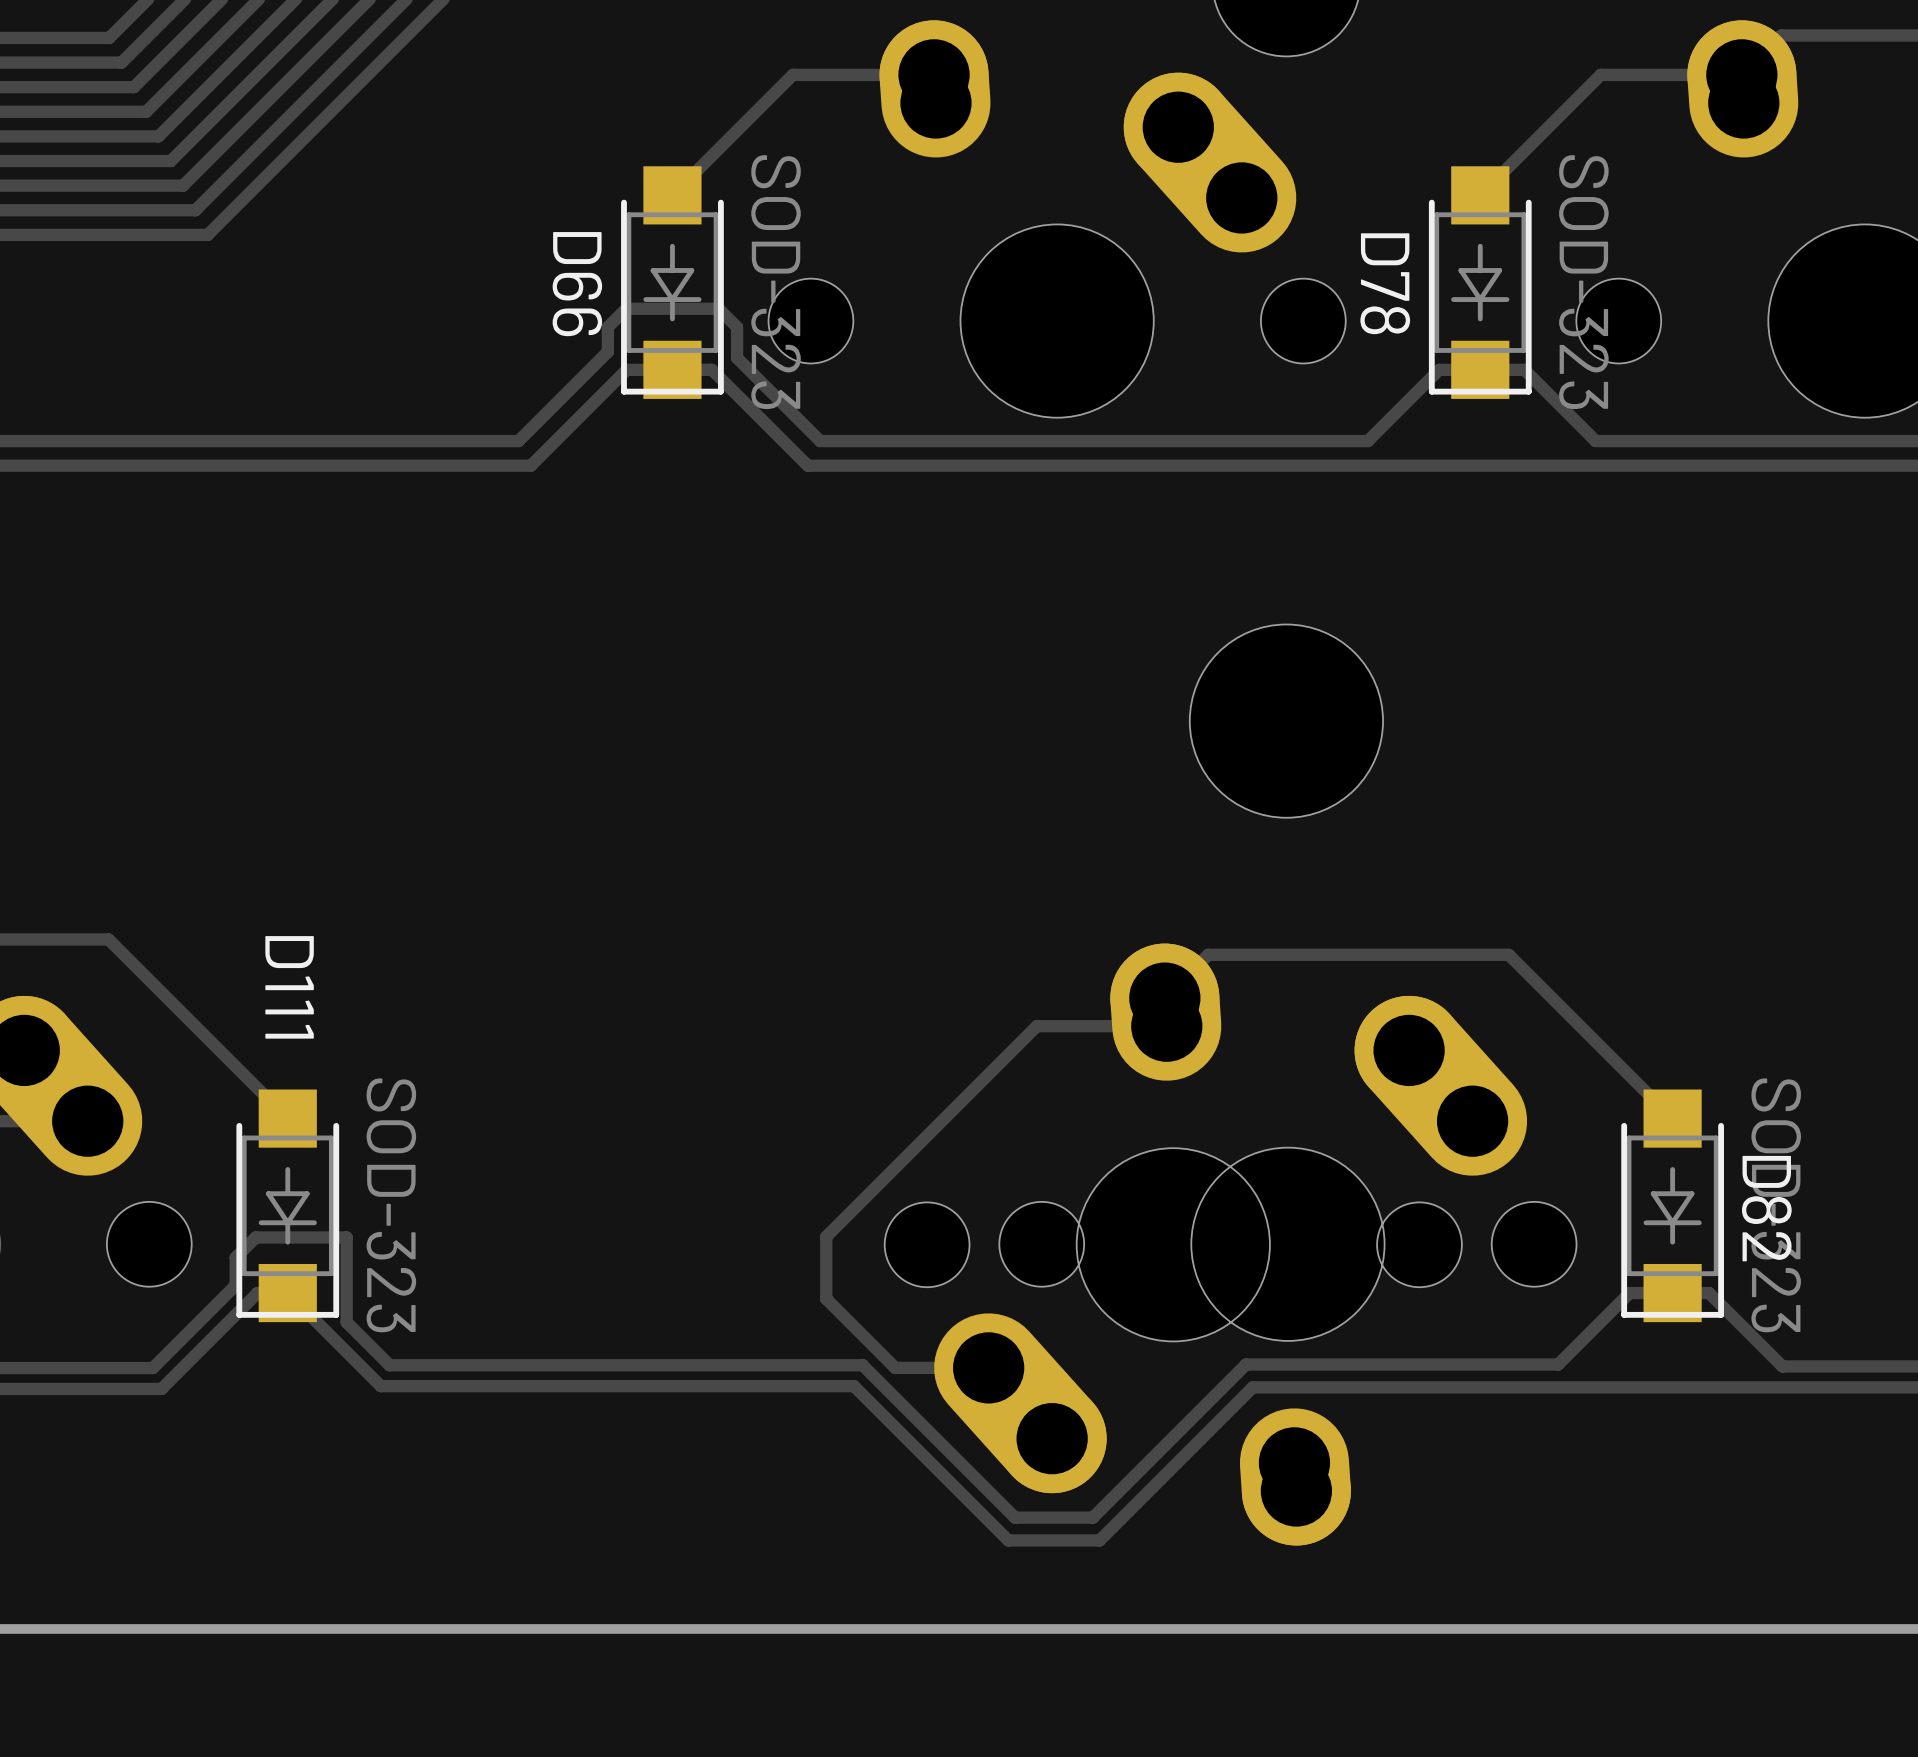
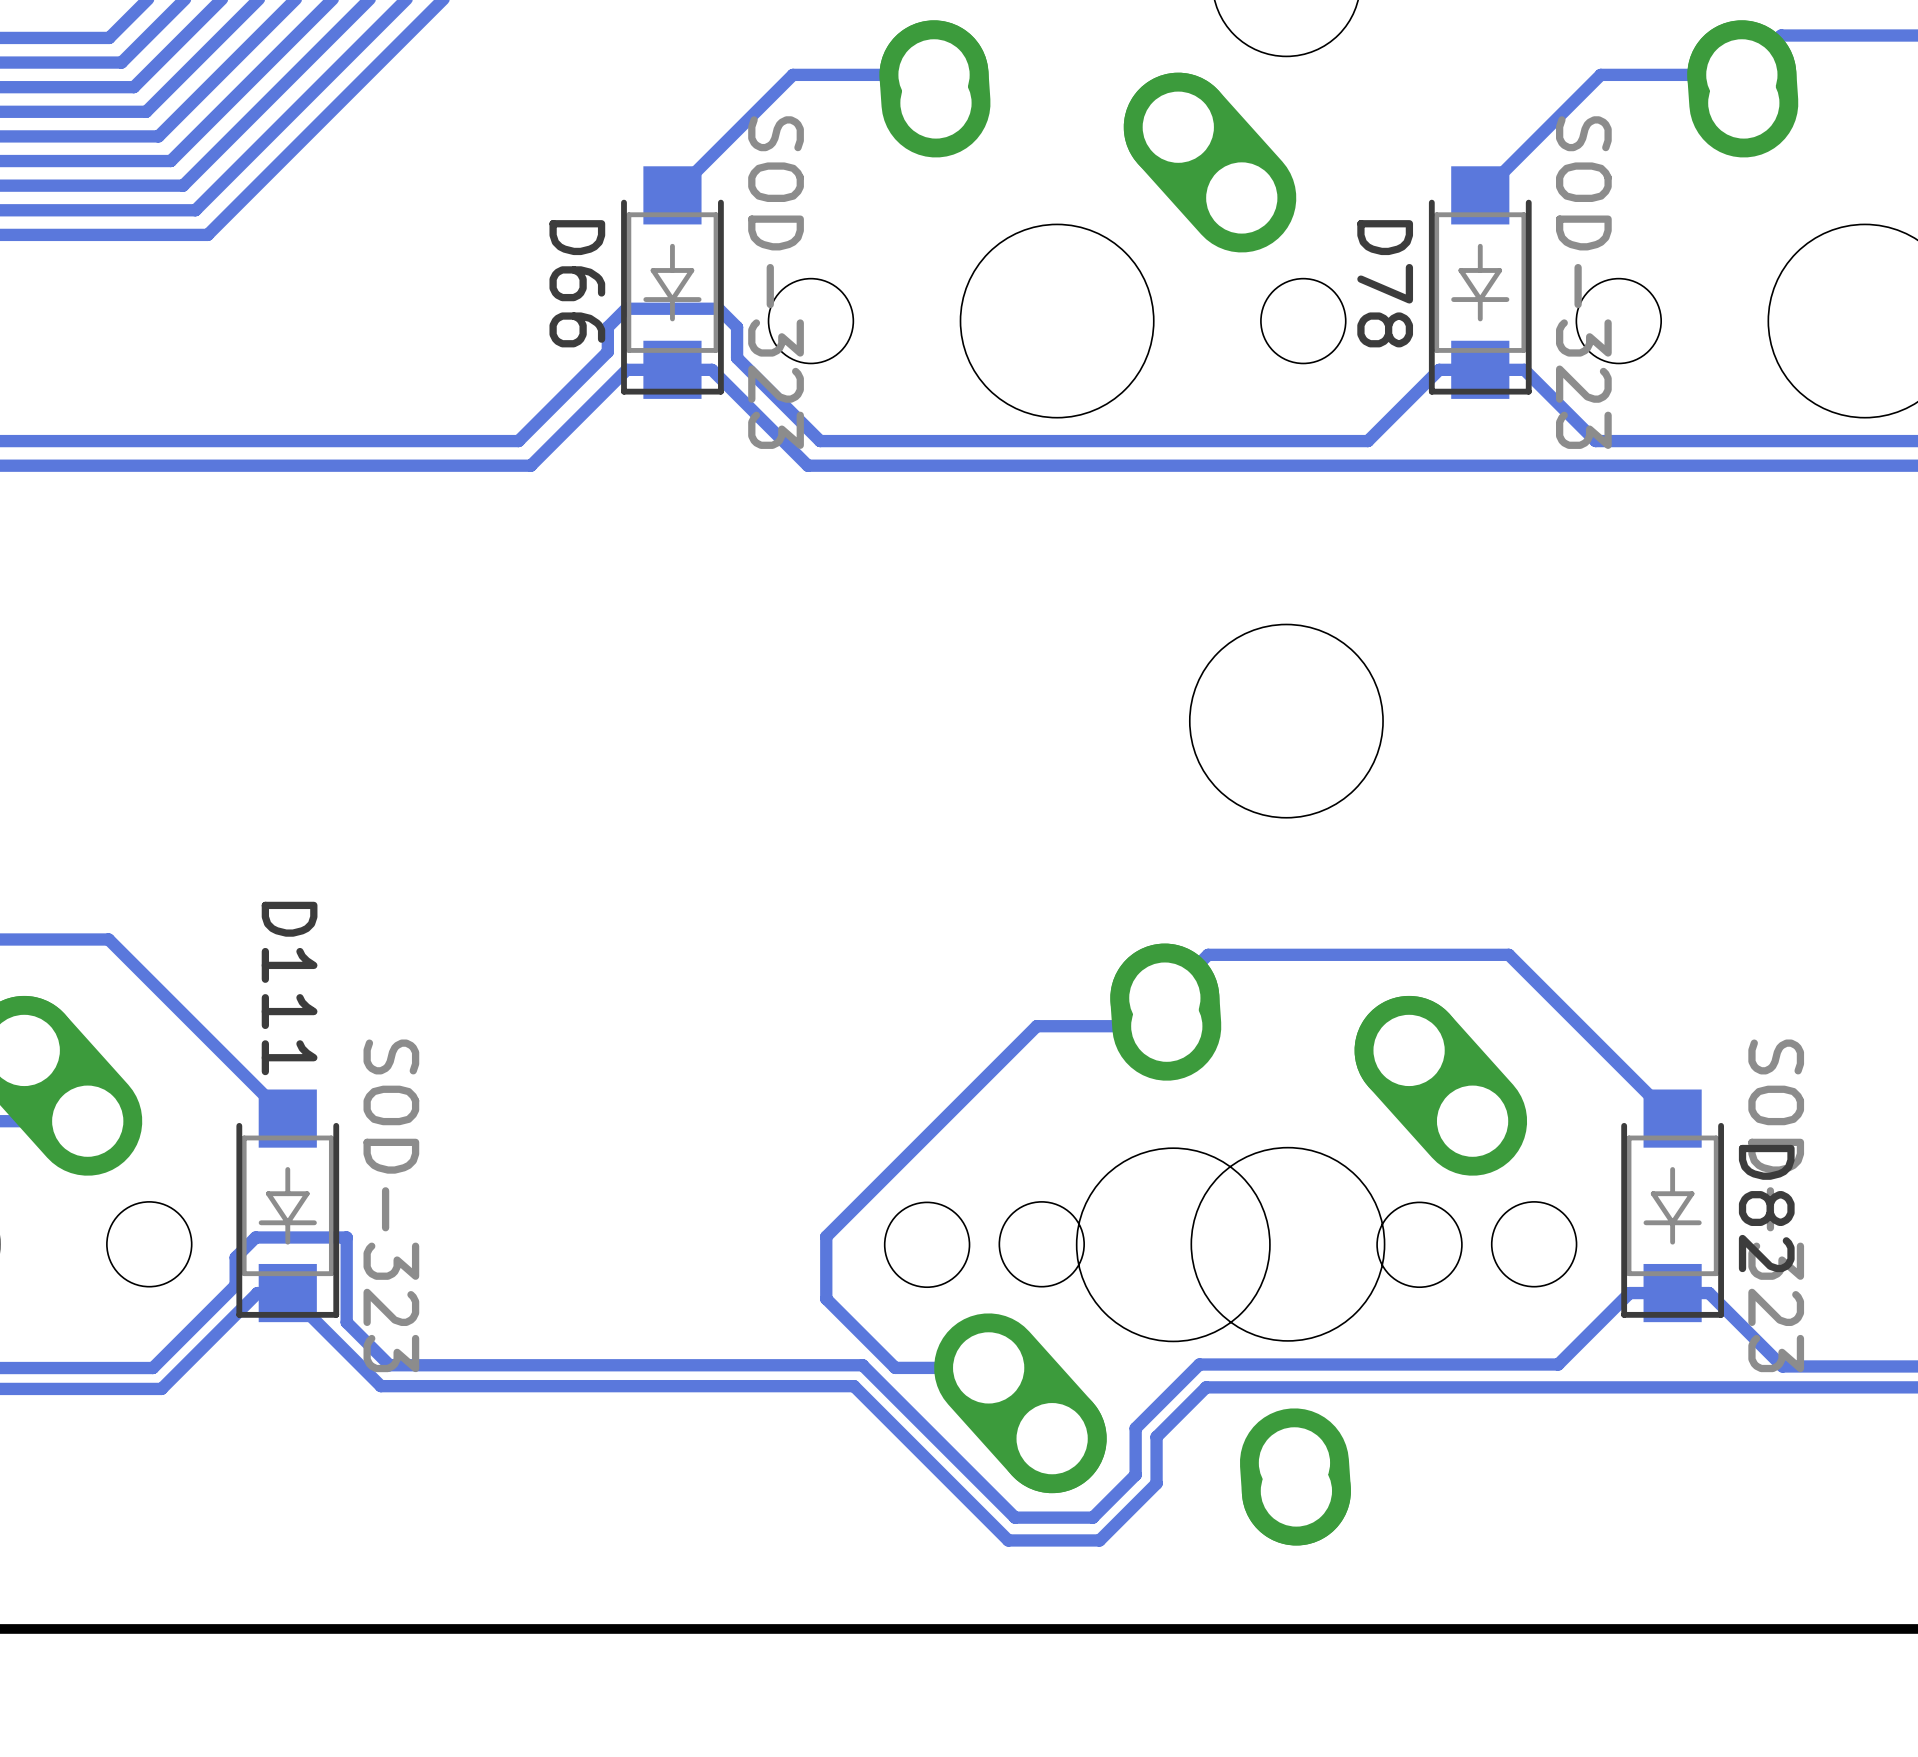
track: (1246, 1364) (1135, 1474) -> (1246, 1364) (1199, 1364) (1135, 1428) (1135, 1474)
track: (1252, 1387) (1156, 1483) -> (1252, 1387) (1206, 1387) (1156, 1436) (1156, 1483)

